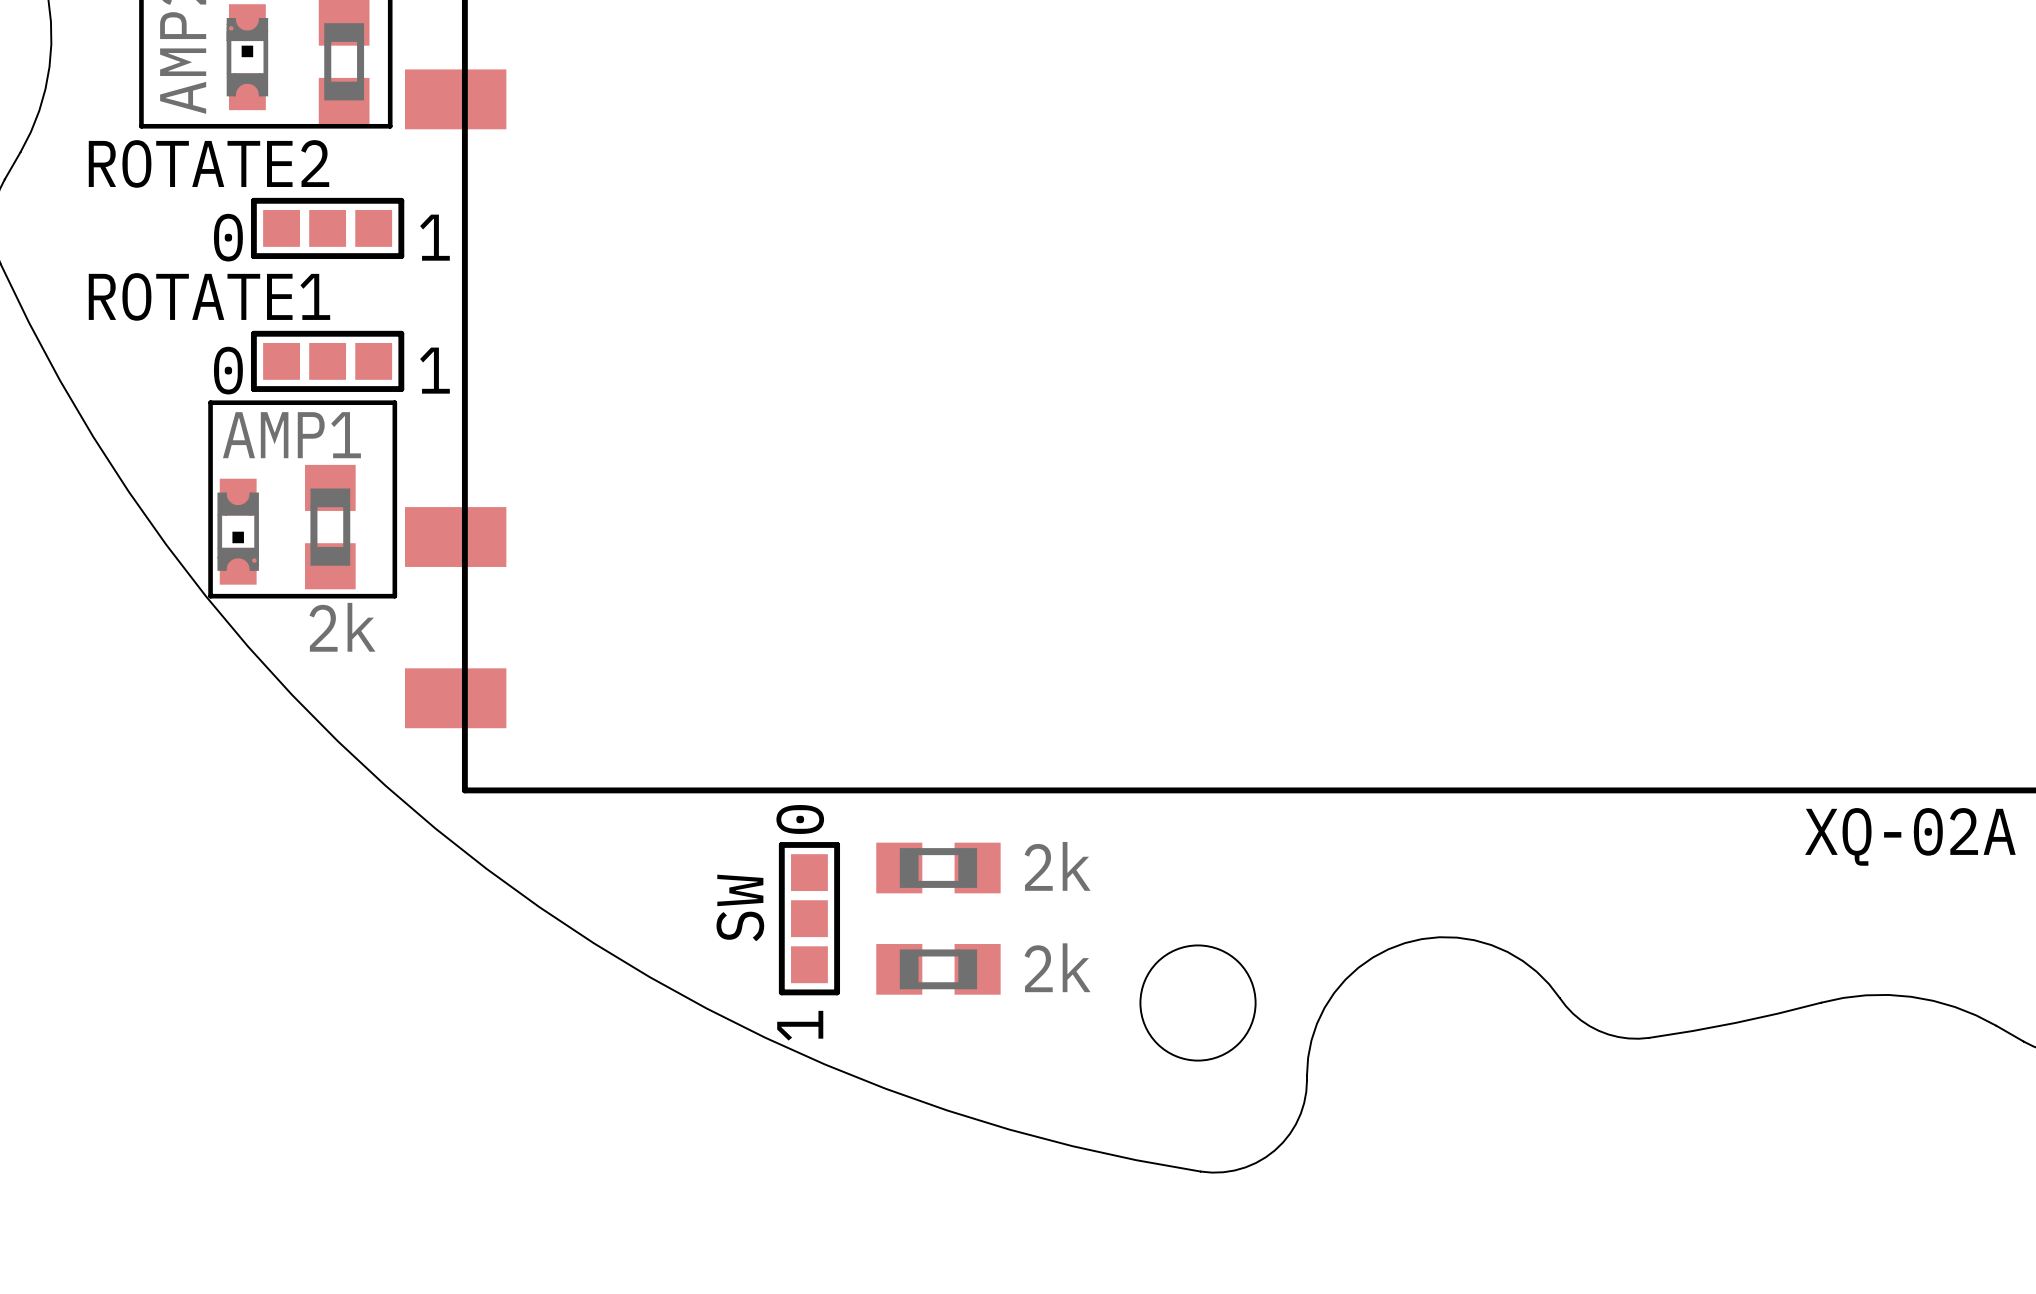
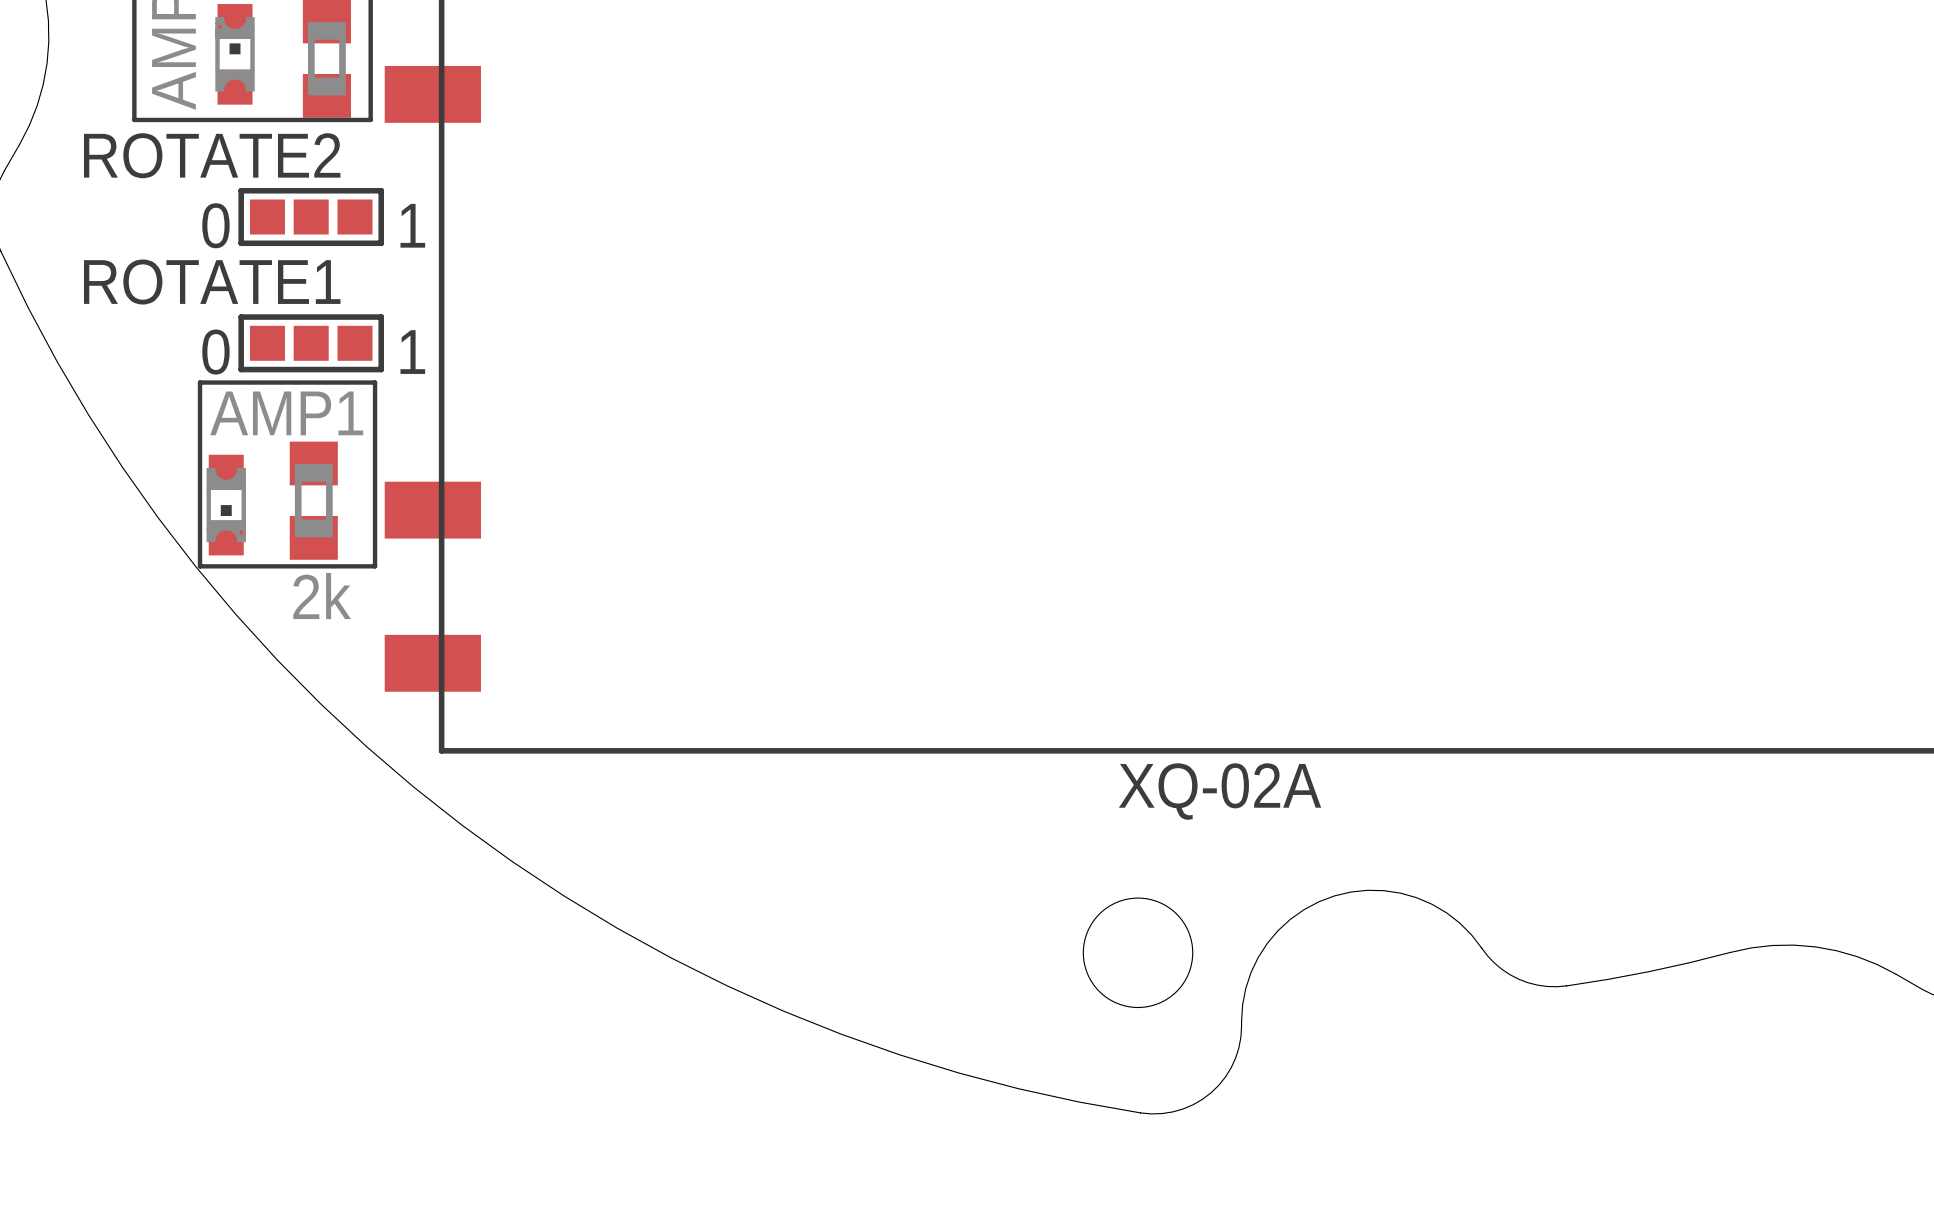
XQ-02A name position: XQ-02A (1910, 836) -> XQ-02A (1220, 791)
part: 2k (938, 868) -> none
SW: (809, 918) -> none
part: 2k (938, 969) -> none

